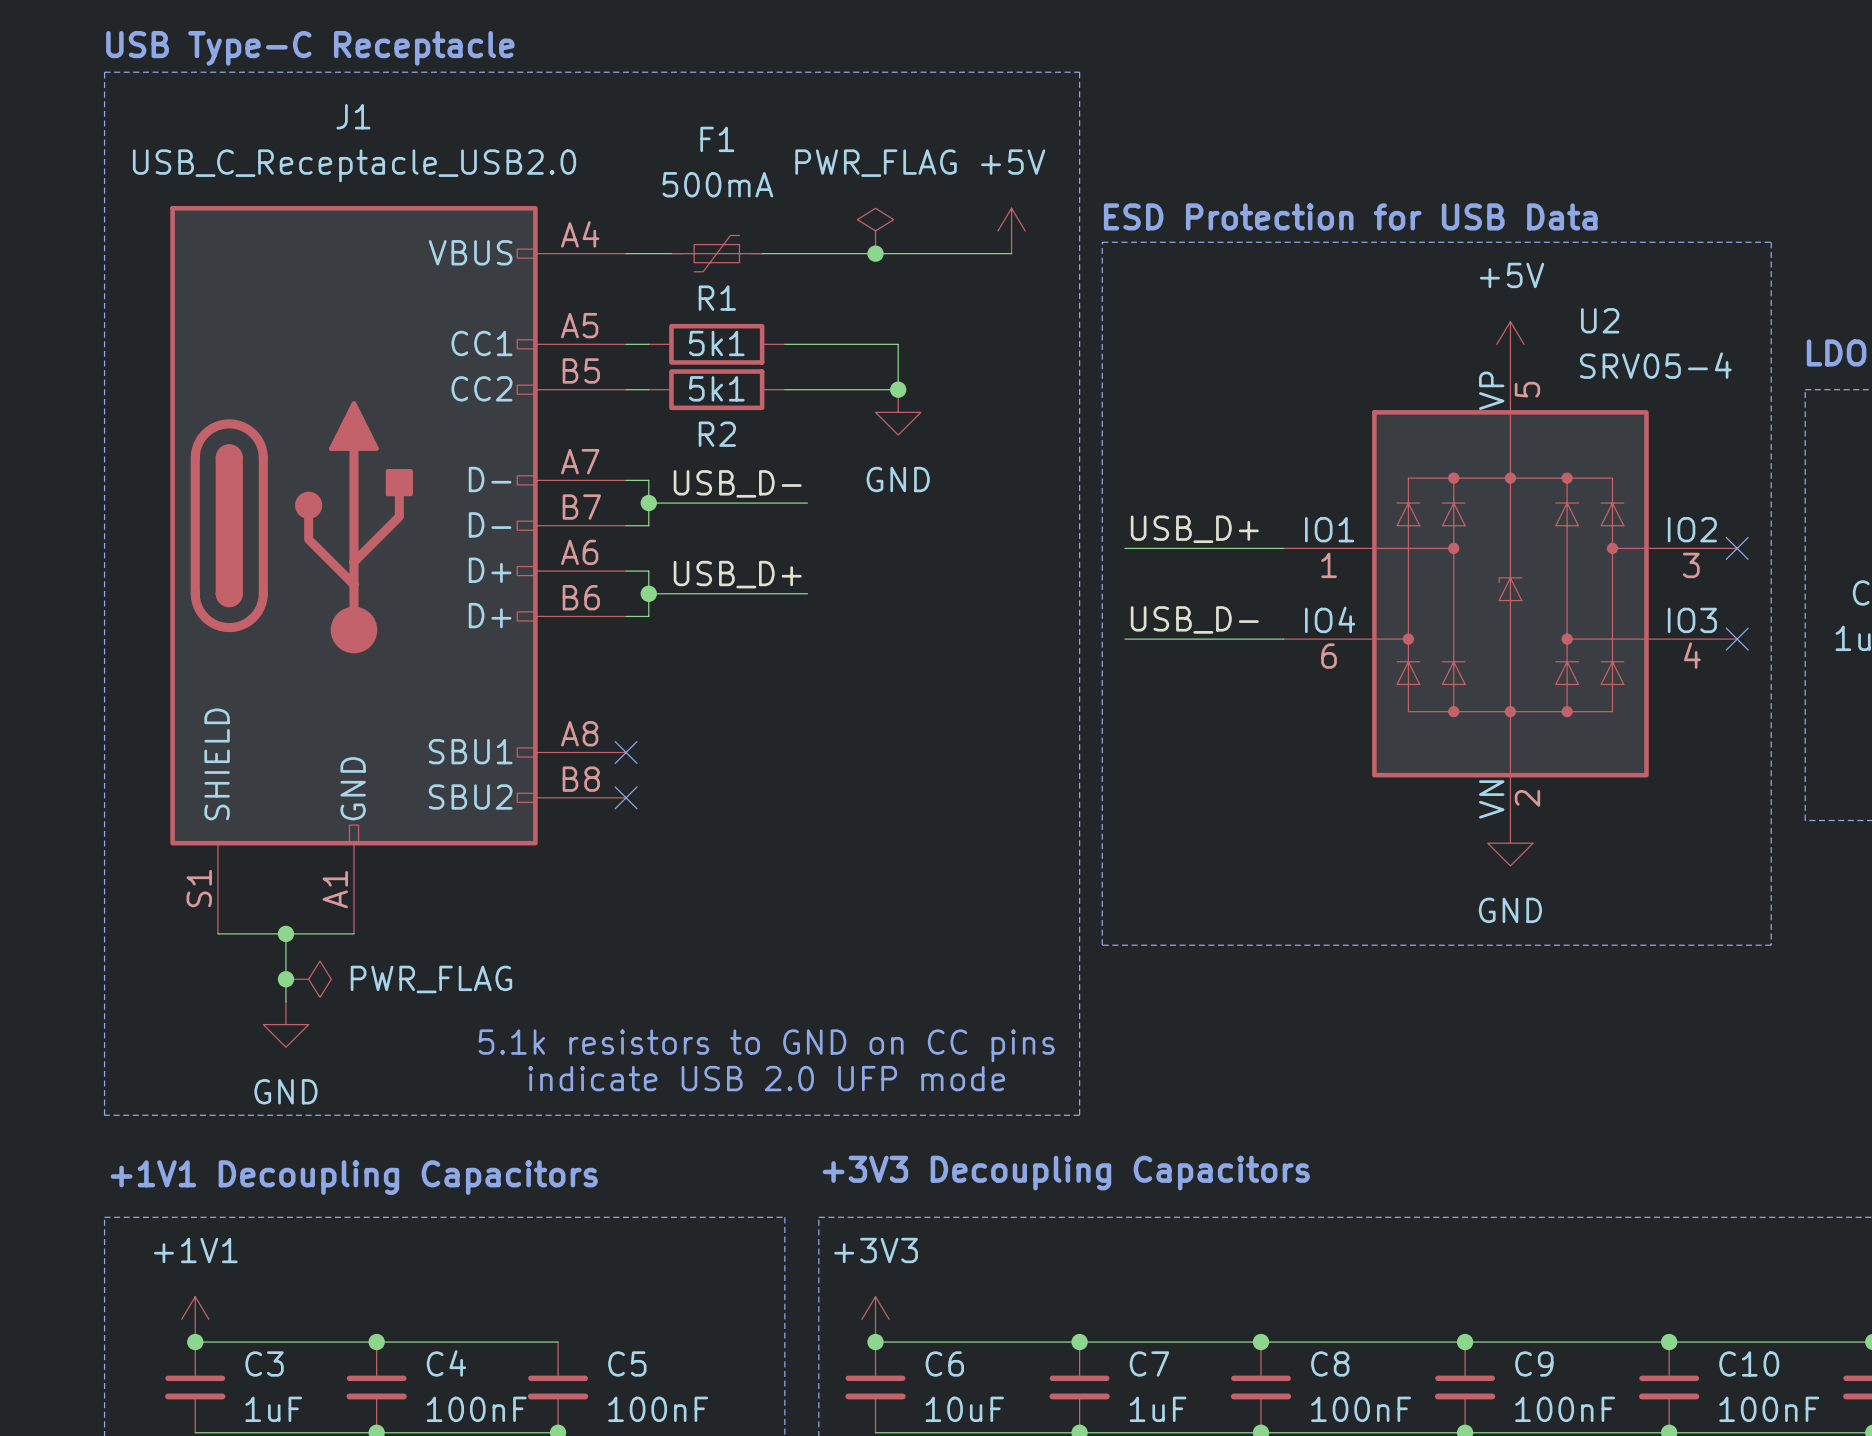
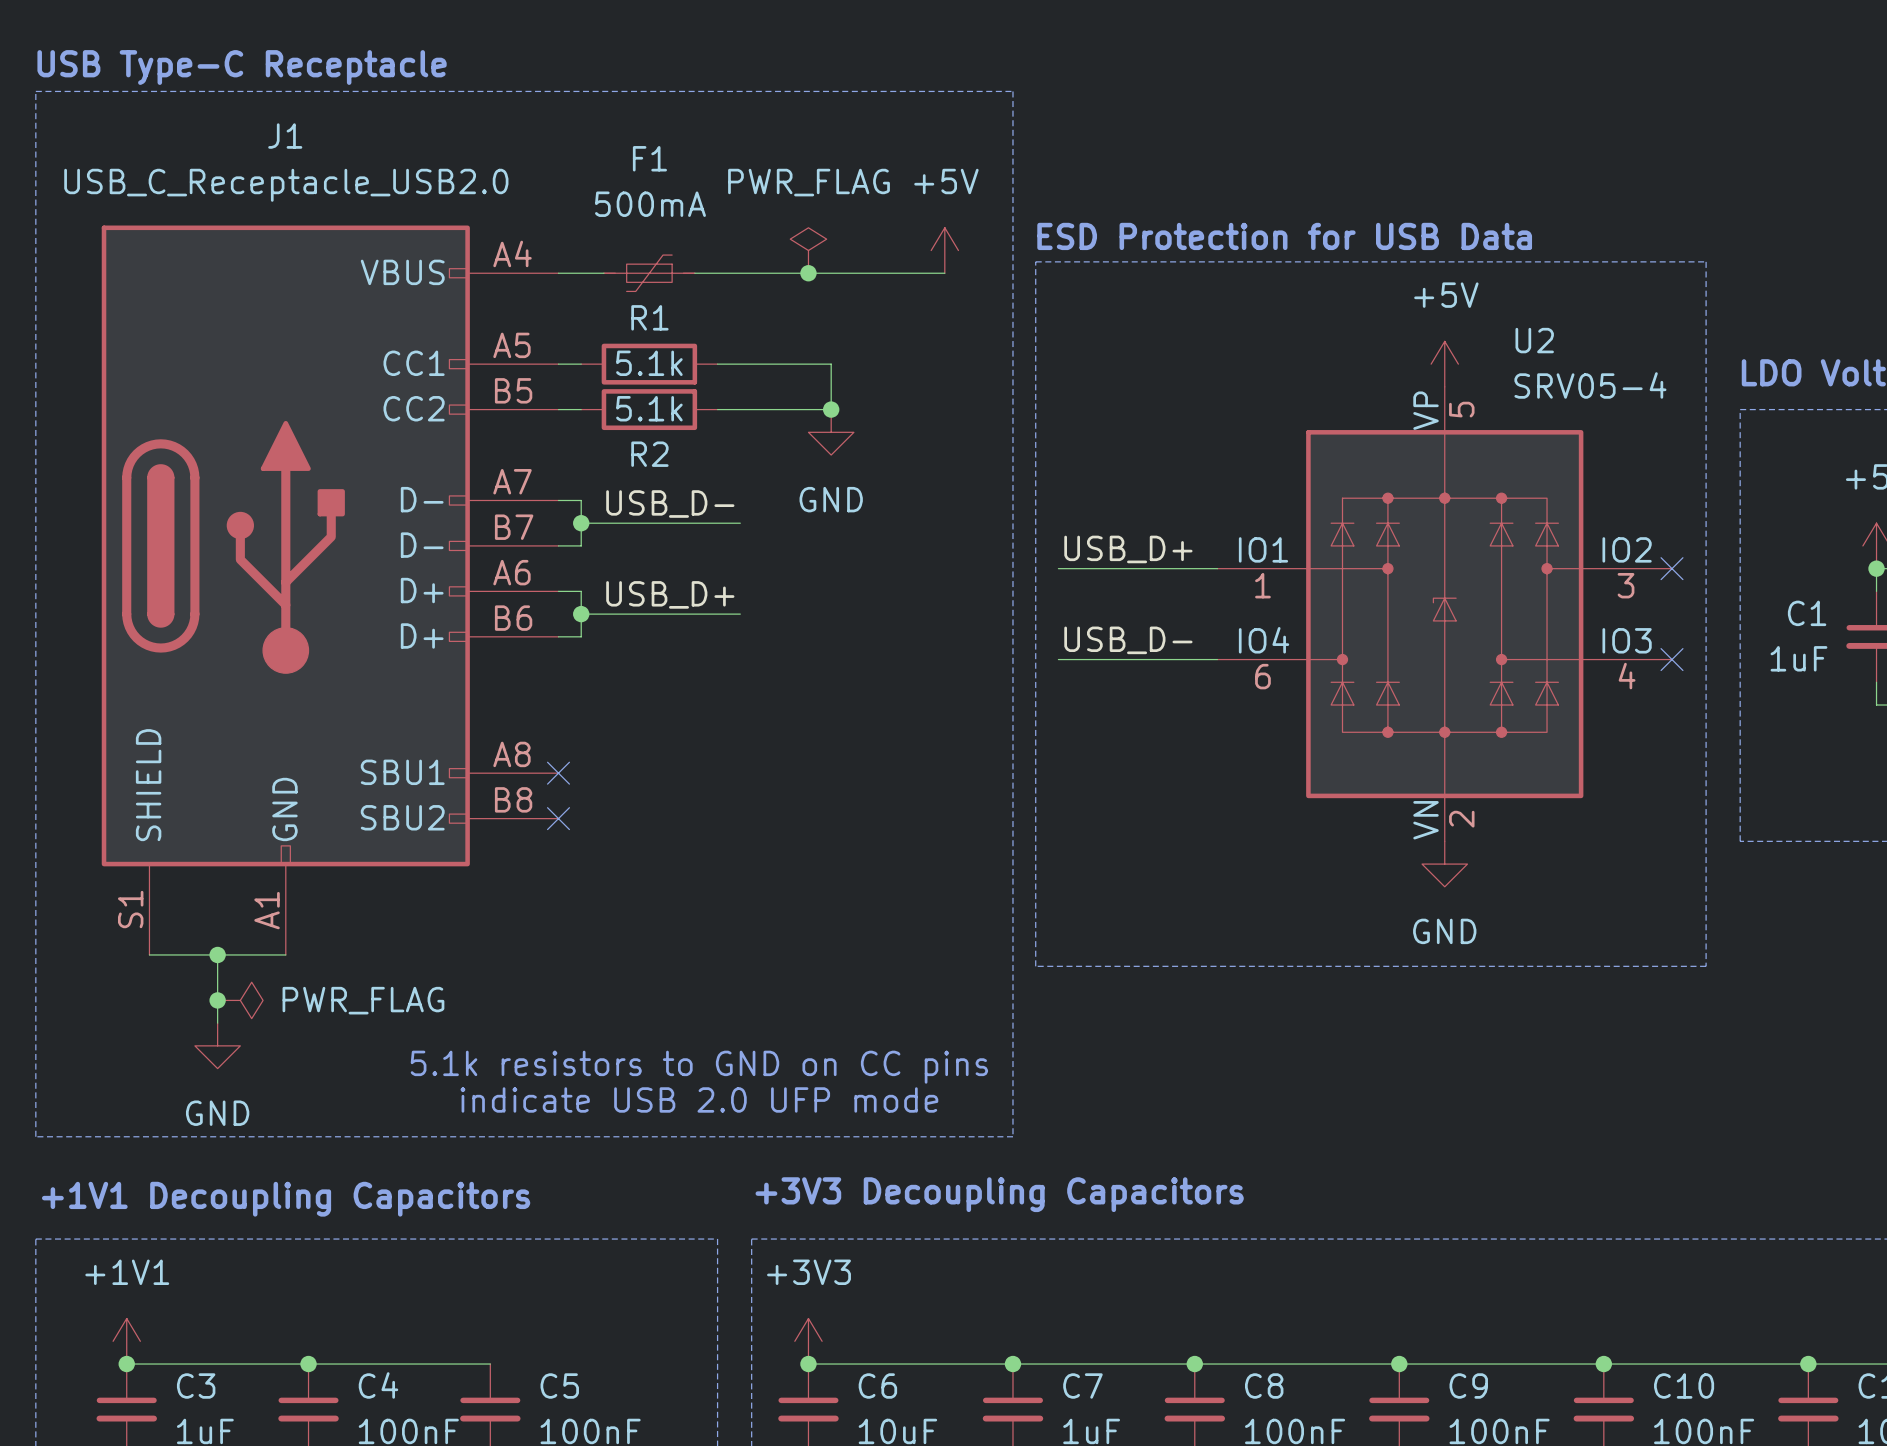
R1 value: 5k1 (716, 343) -> 5.1k (649, 363)
R2 value: 5k1 (716, 388) -> 5.1k (649, 408)

